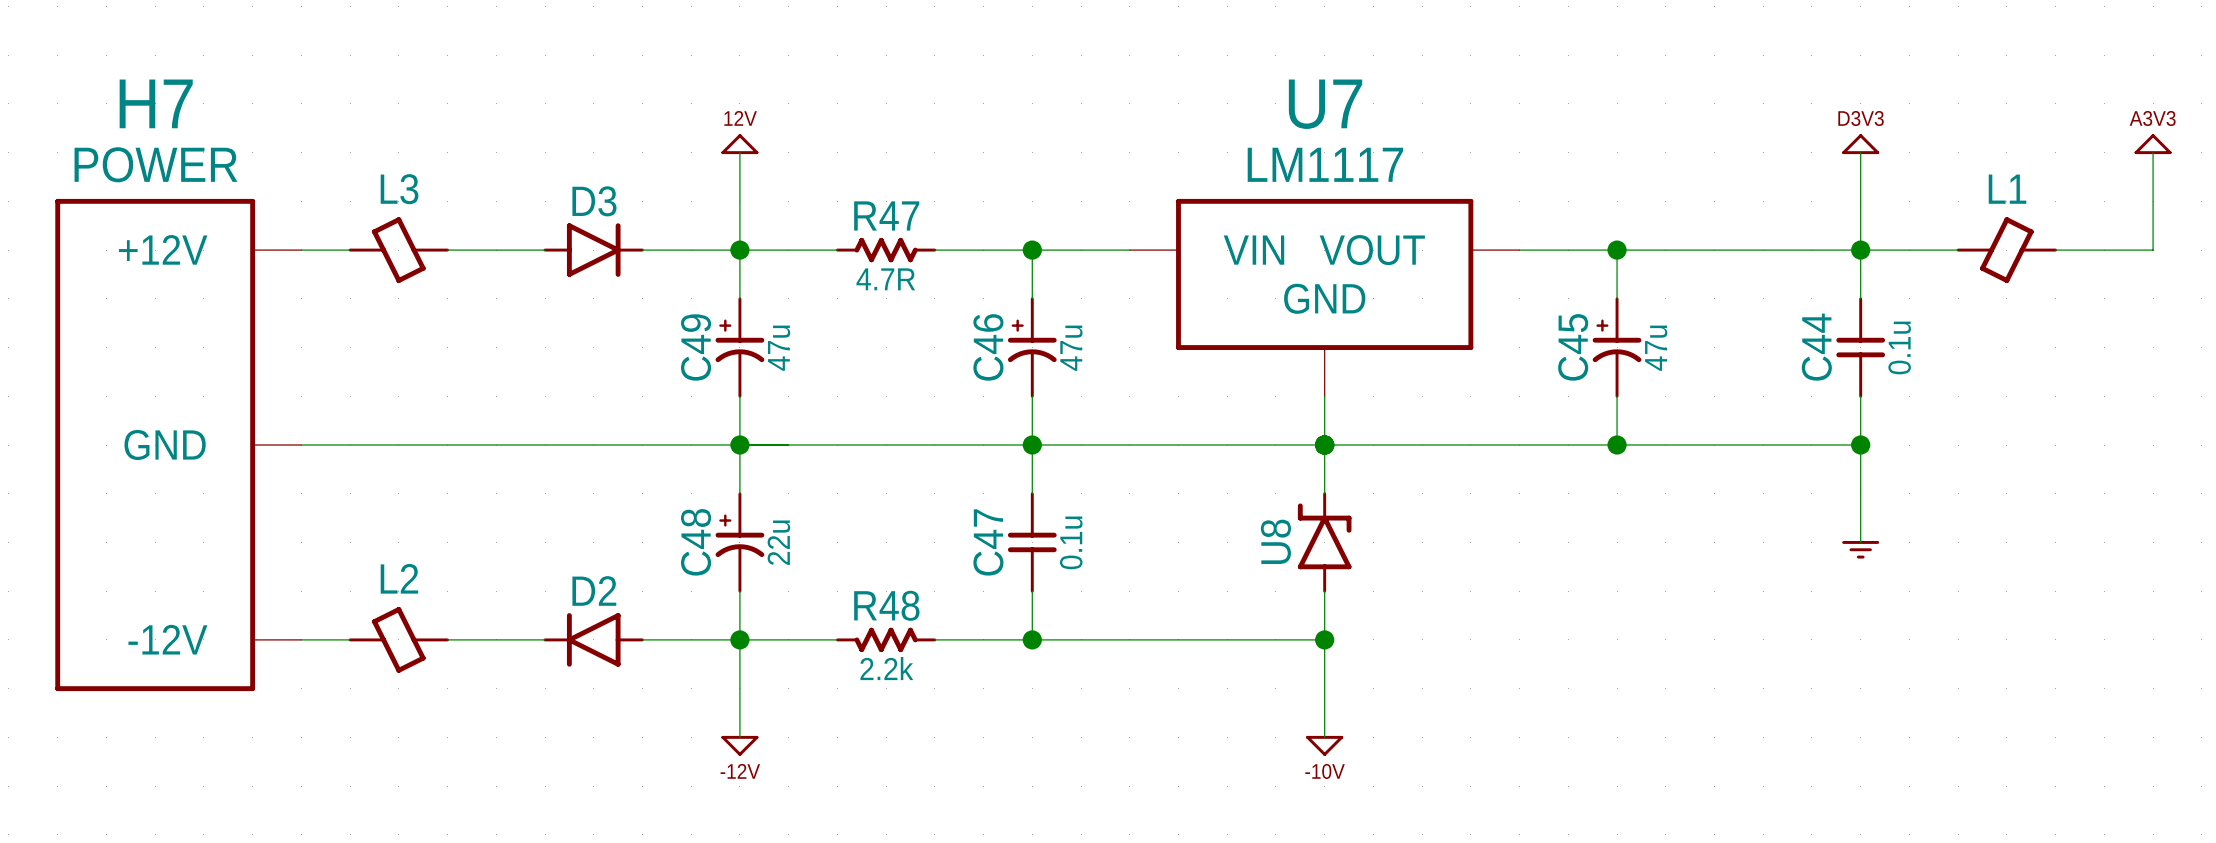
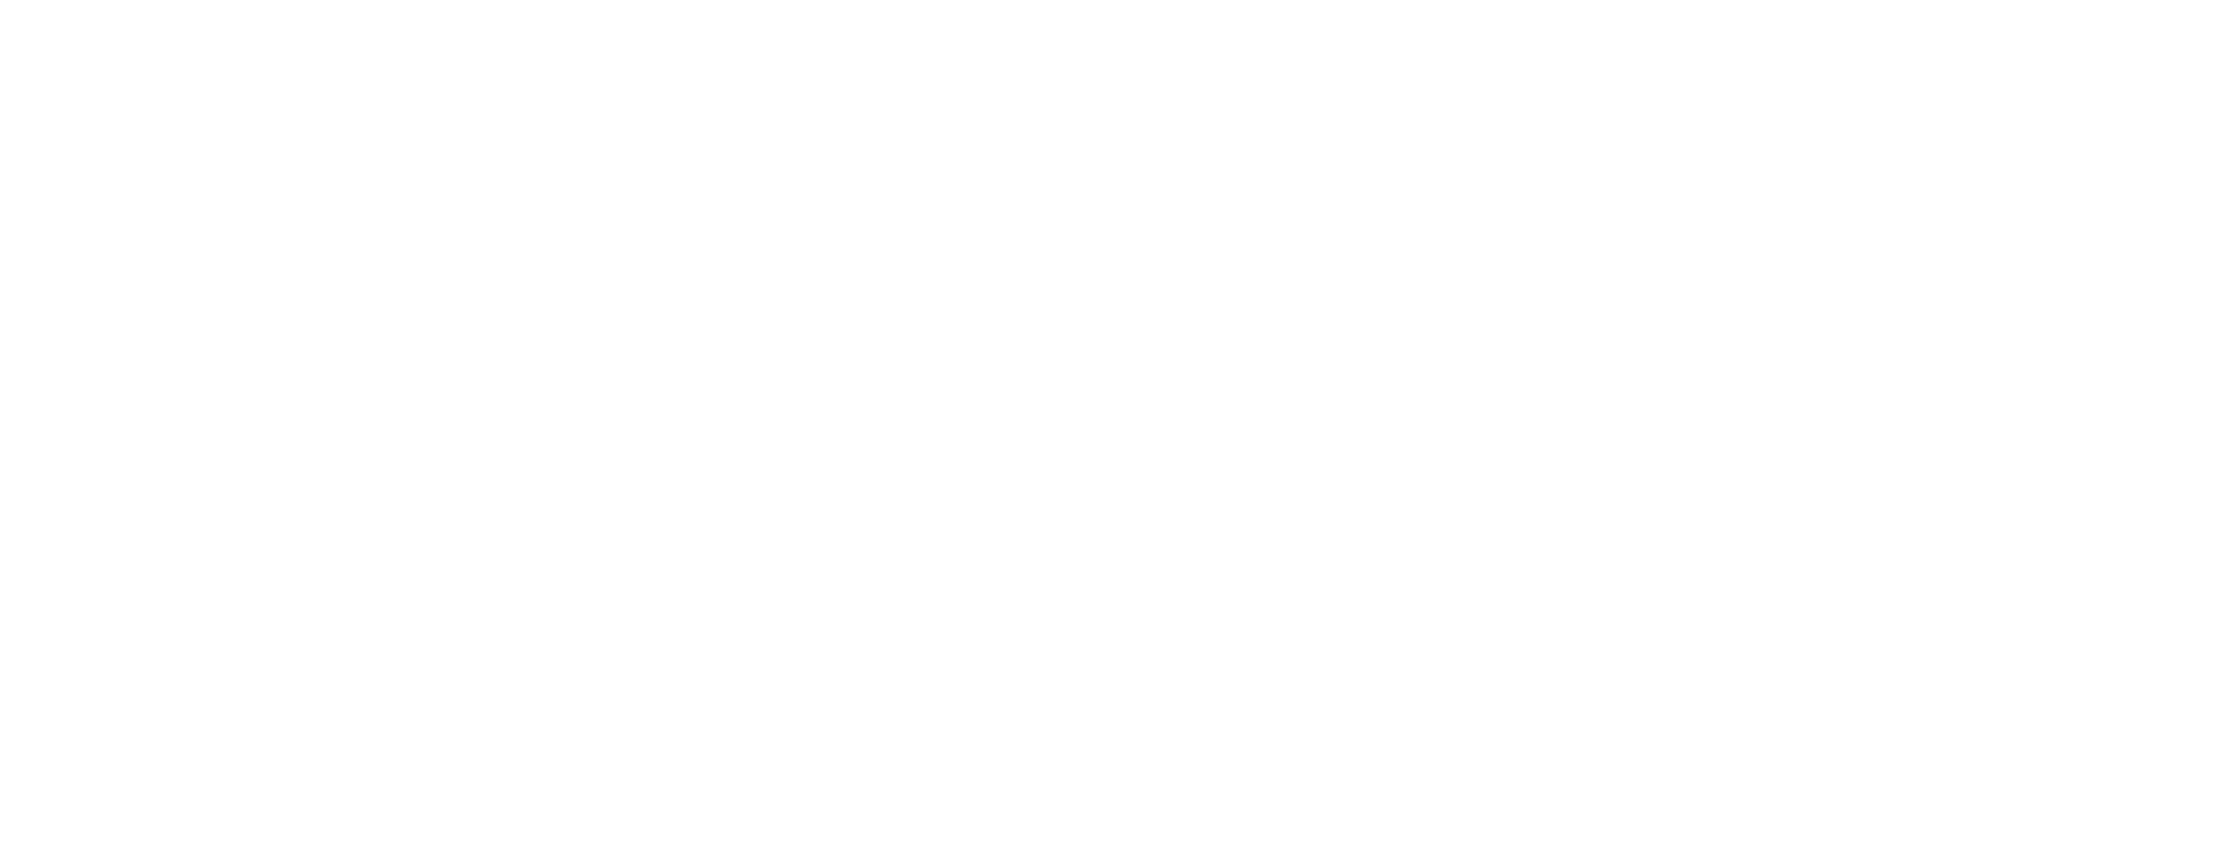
power symbol: (739, 144) -> none
power symbol: (1860, 144) -> none
power symbol: (2153, 144) -> none
wire: (739, 152) (739, 298) -> none
wire: (1860, 152) (1860, 298) -> none
wire: (2153, 152) (2153, 250) (2055, 250) -> none
wire: (301, 250) (350, 250) -> none
L3: (398, 250) -> none
wire: (447, 250) (545, 250) -> none
D3: (593, 250) -> none
wire: (642, 250) (837, 250) -> none
junction: (739, 250) -> none
R47: 4.7R (886, 250) -> none
wire: (934, 250) (1129, 250) -> none
wire: (1032, 250) (1032, 298) -> none
junction: (1032, 250) -> none
wire: (1519, 250) (1958, 250) -> none
wire: (1617, 250) (1617, 298) -> none
junction: (1617, 250) -> none
junction: (1860, 250) -> none
L1: (2006, 250) -> none
U7: LM1117 (1324, 297) -> none
C49: 47u (739, 347) -> none
C46: 47u (1032, 347) -> none
C45: 47u (1617, 347) -> none
C44: 0.1u (1860, 347) -> none
wire: (739, 396) (739, 493) -> none
wire: (1032, 396) (1032, 493) -> none
wire: (1324, 396) (1324, 493) -> none
wire: (1617, 396) (1617, 445) -> none
wire: (1860, 396) (1860, 542) -> none
H7: POWER (178, 445) -> none
wire: (301, 445) (1860, 445) -> none
junction: (739, 445) -> none
junction: (1032, 445) -> none
junction: (1324, 445) -> none
junction: (1617, 445) -> none
junction: (1860, 445) -> none
C48: 22u (739, 542) -> none
C47: 0.1u (1032, 542) -> none
U8: (1324, 542) -> none
power symbol: (1860, 549) -> none
wire: (739, 591) (739, 737) -> none
wire: (1032, 591) (1032, 639) -> none
wire: (1324, 591) (1324, 737) -> none
wire: (301, 639) (350, 639) -> none
L2: (398, 639) -> none
wire: (447, 639) (545, 639) -> none
D2: (593, 639) -> none
wire: (642, 639) (837, 639) -> none
junction: (739, 639) -> none
R48: 2.2k (886, 639) -> none
wire: (934, 639) (1324, 639) -> none
junction: (1032, 639) -> none
junction: (1324, 639) -> none
power symbol: (739, 745) -> none
power symbol: (1324, 745) -> none

